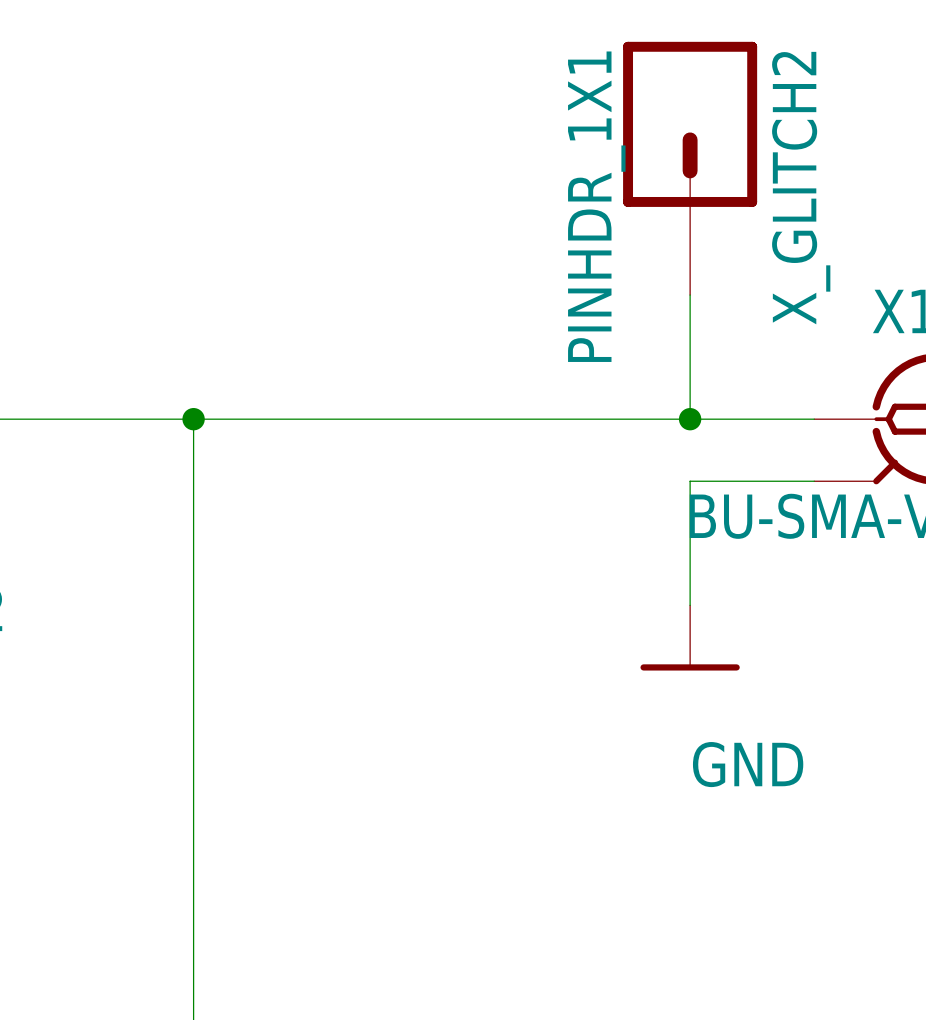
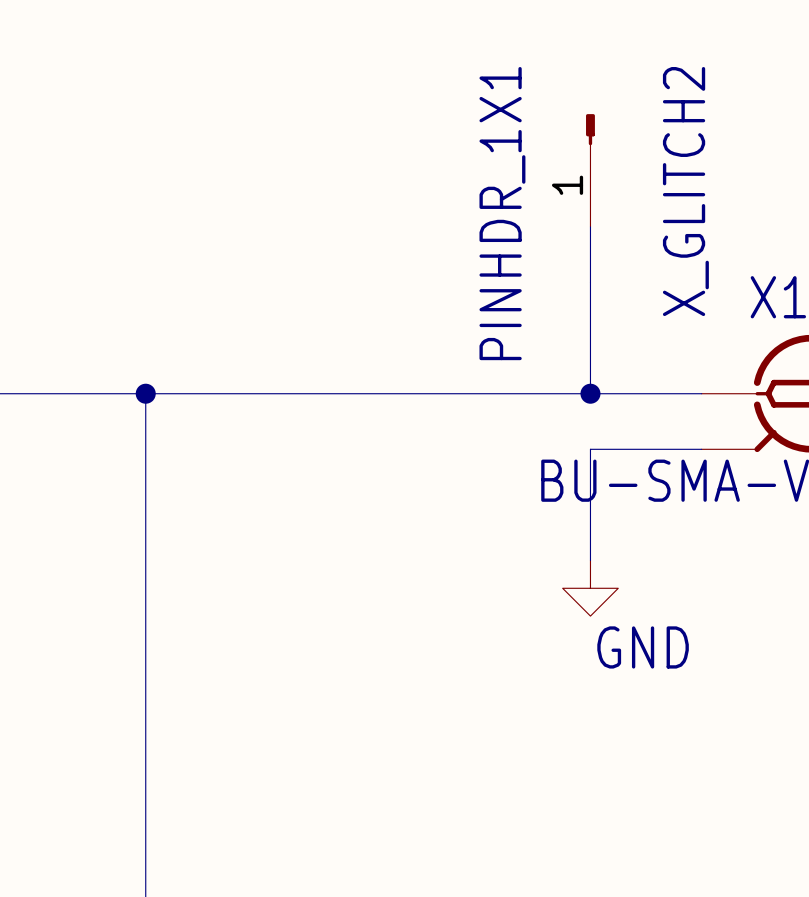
X_GLITCH2 symbol: [623, 41, 758, 296] -> [586, 114, 595, 227]
power symbol shape: [640, 605, 740, 671] -> [562, 560, 619, 617]
power symbol text position: GND (748, 764) -> GND (643, 647)

